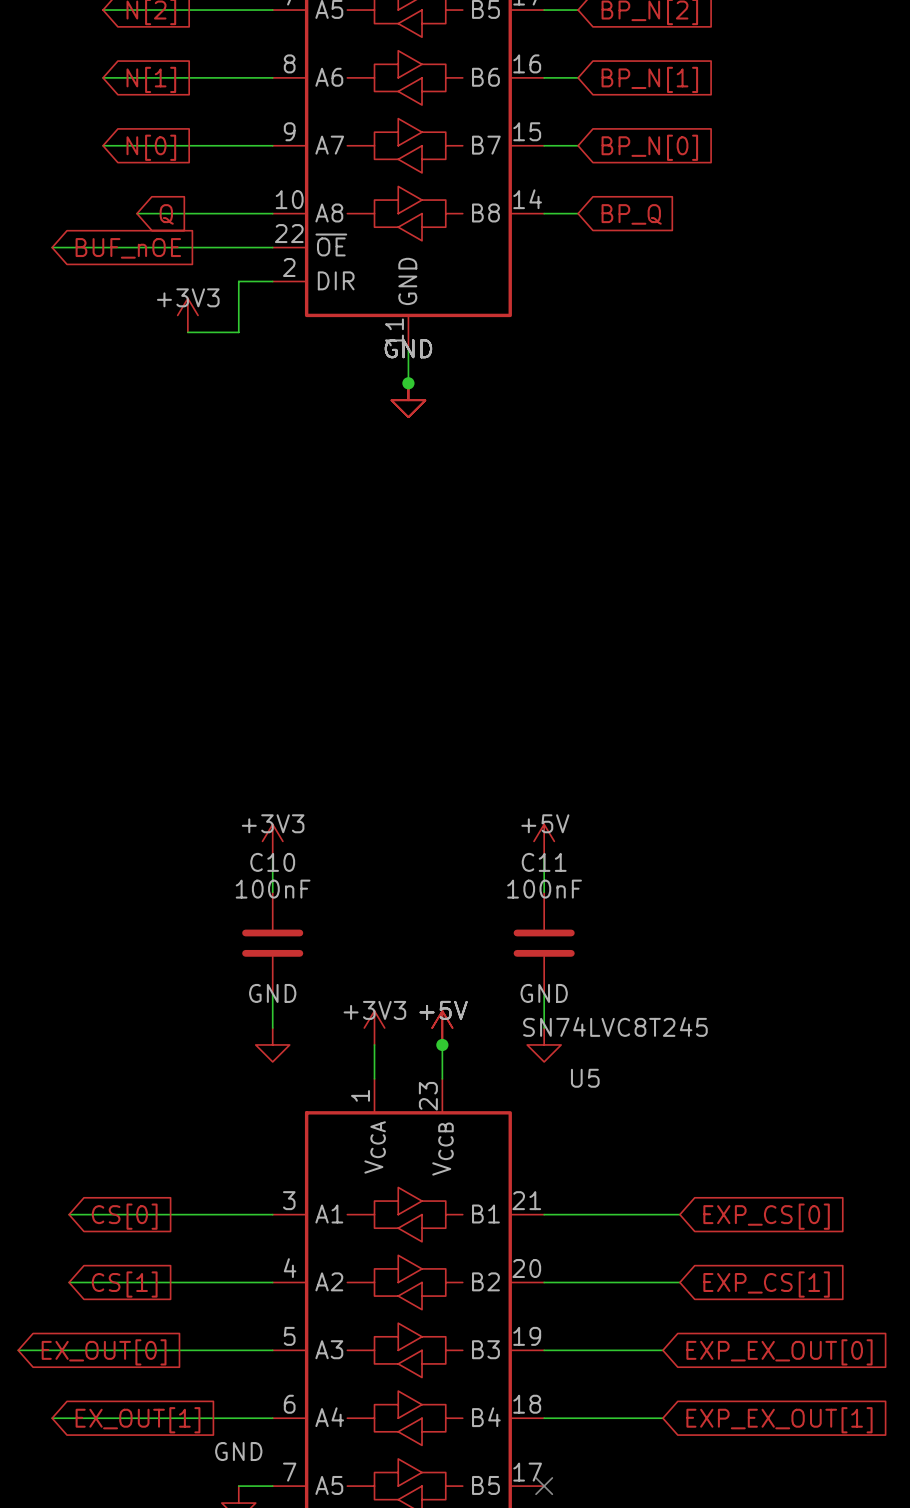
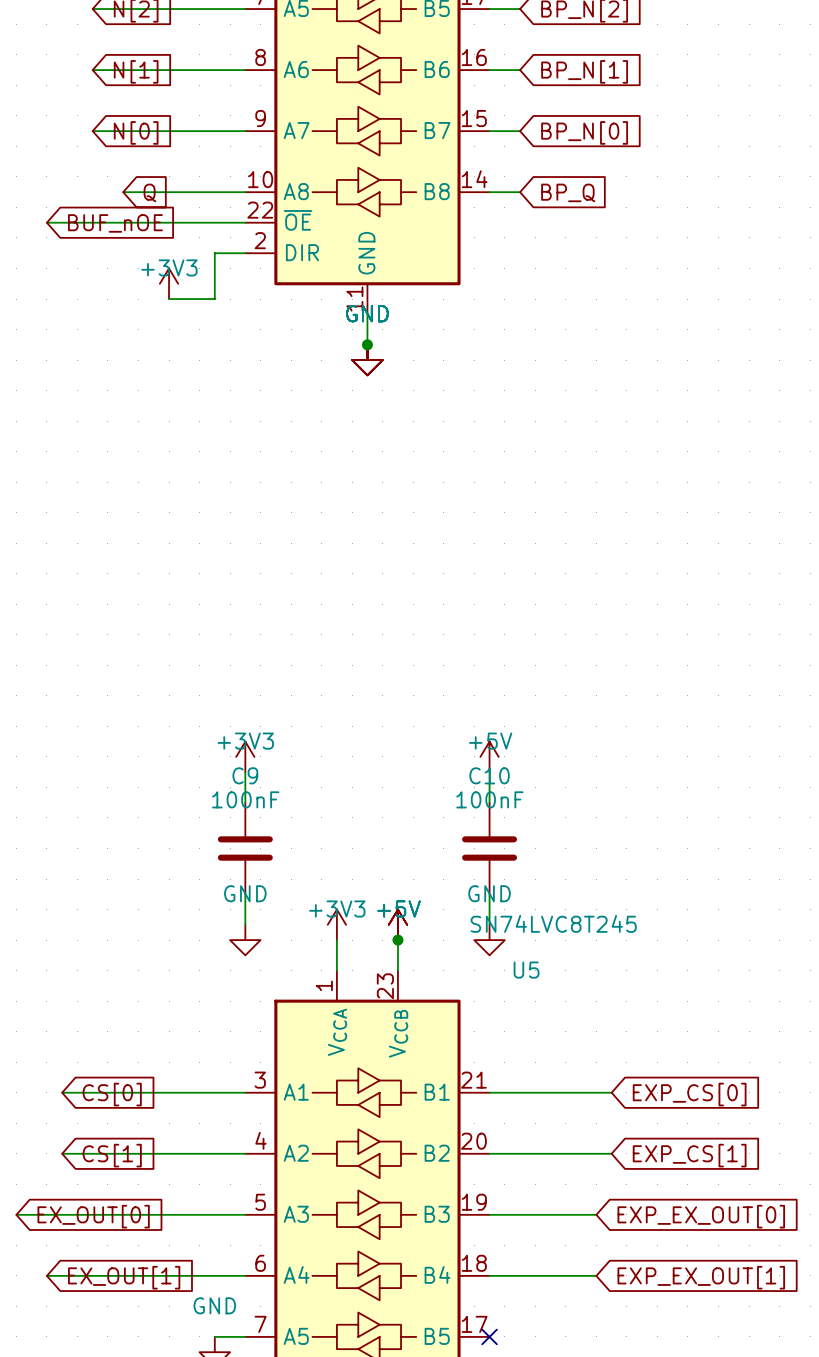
C10 name: C10 (272, 862) -> C9 (245, 775)
C11 name: C11 (544, 862) -> C10 (489, 775)

